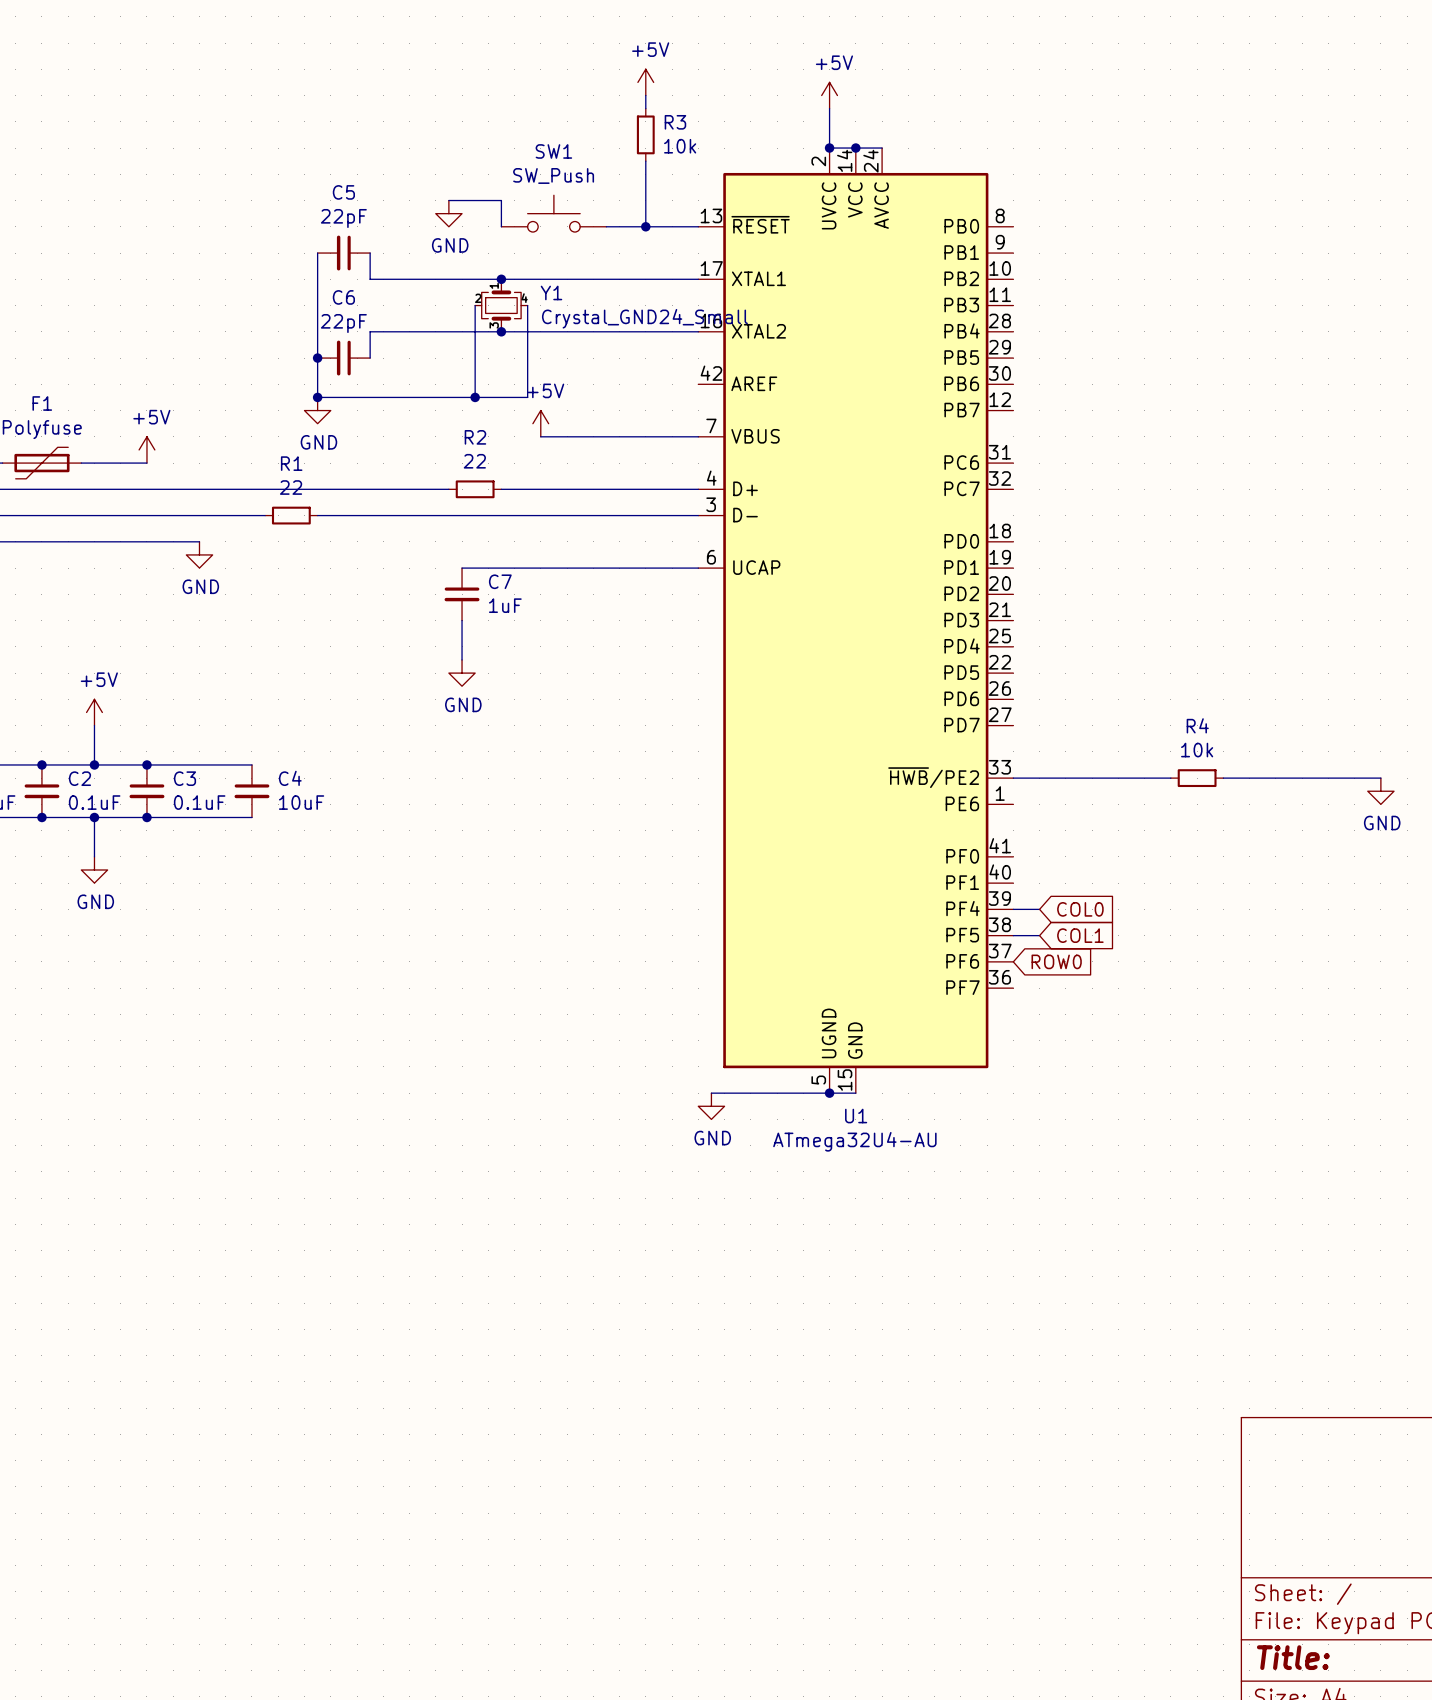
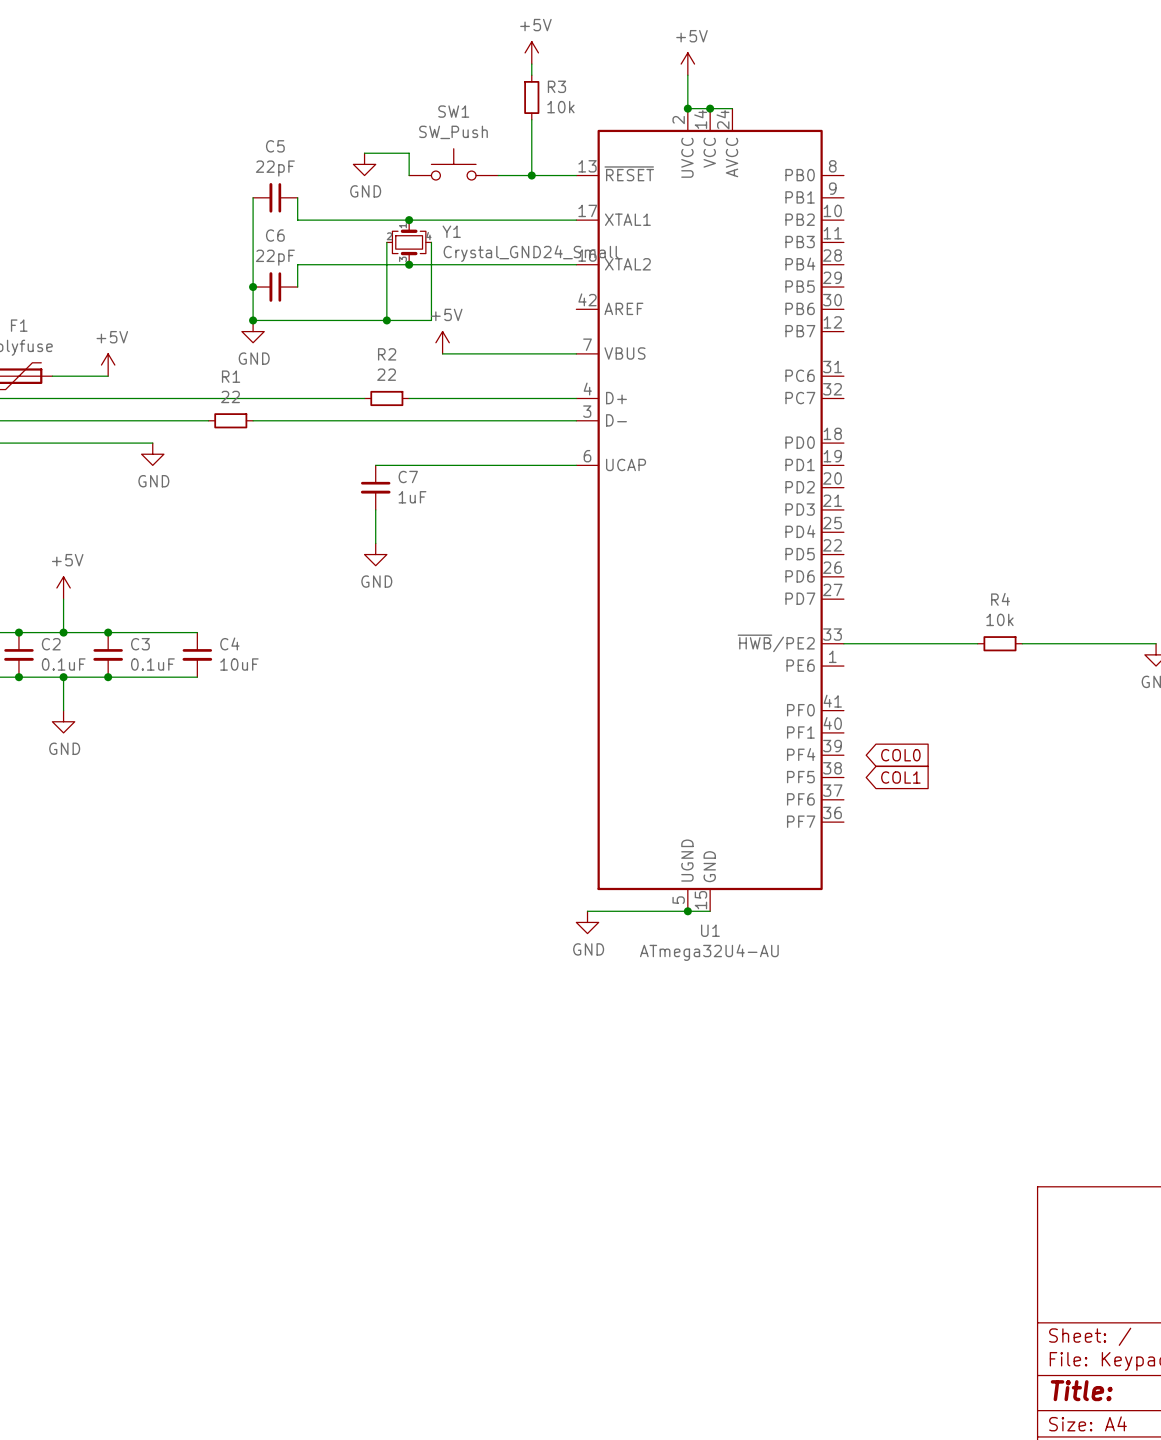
wire: (1013, 909) (1039, 909) -> none
wire: (1013, 935) (1039, 935) -> none
global label: ROW0 (1056, 961) -> none

